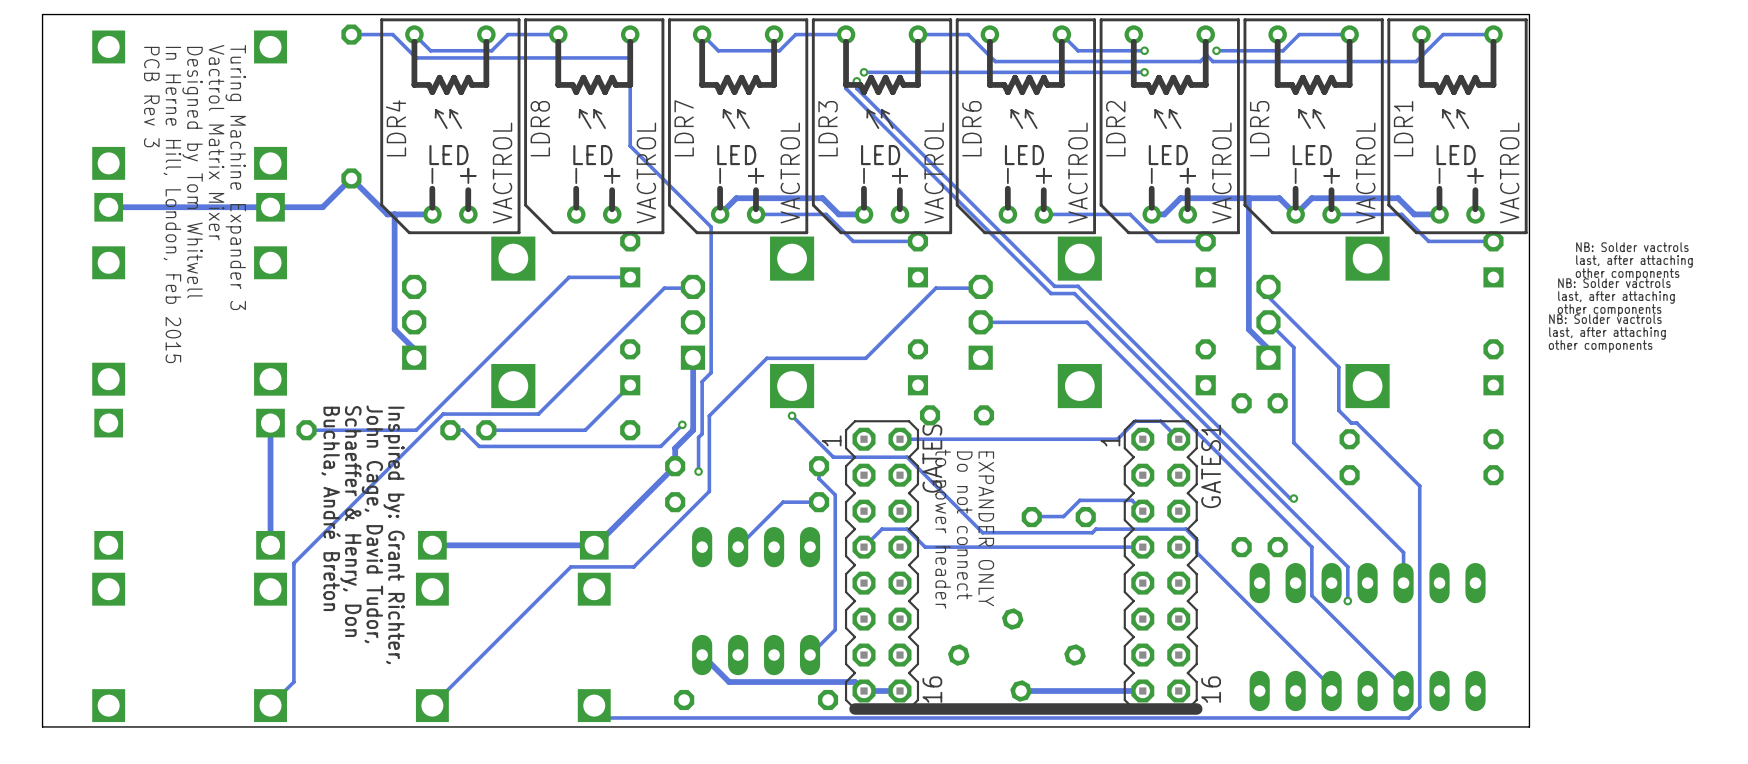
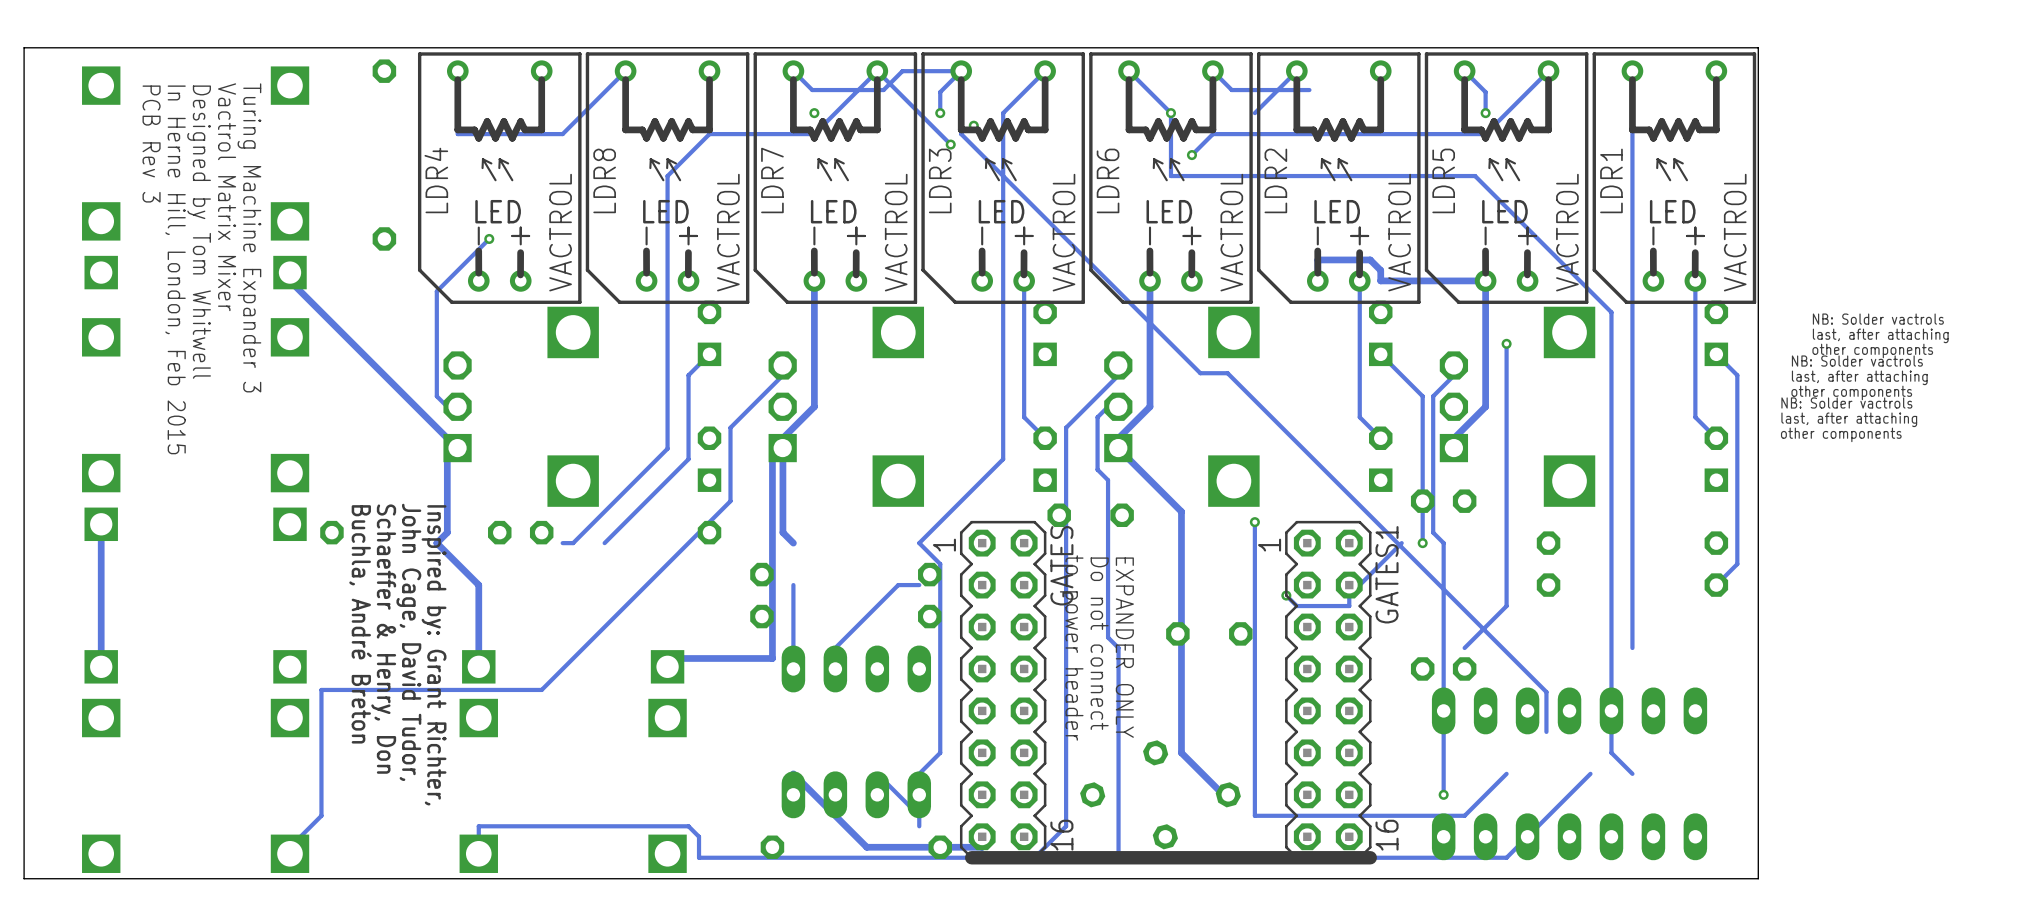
track: (351, 34) (392, 34) (416, 57) (630, 57) -> none
track: (558, 34) (507, 34) (491, 50) (430, 50) (414, 34) -> (625, 71) (562, 134) (457, 134) (457, 71)
track: none -> (961, 71) (940, 92) (940, 113)
track: (917, 34) (968, 34) (995, 61) (1200, 61) (1206, 55) -> (1045, 71) (1003, 113) (1003, 459) (919, 543) (940, 564) (940, 752) (919, 773)
track: none -> (1296, 71) (1254, 113)
track: none -> (1464, 71) (1485, 92) (1485, 113)
track: (1349, 34) (1299, 34) (1283, 50) (1216, 50) -> (1548, 71) (1485, 134) (1212, 134) (1191, 155)
track: none -> (1632, 71) (1632, 647)
track: (1493, 34) (1443, 34) (1416, 61) (1212, 61) (1205, 54) (1205, 34) -> none
via: (1144, 50) -> none
via: (1216, 50) -> none
via: none -> (814, 113)
via: none -> (940, 113)
via: none -> (1170, 113)
via: none -> (1485, 113)
via: (864, 72) -> none
track: (1144, 72) (864, 72) -> none
via: (1144, 72) -> none
track: (856, 81) (856, 88) (1054, 286) (1078, 286) (1290, 498) (1293, 498) -> none
track: (630, 88) (630, 146) (711, 227) (711, 372) (702, 381) (702, 433) (698, 437) (698, 471) -> none
via: none -> (950, 144)
via: none -> (1191, 155)
track: none -> (489, 238) (436, 291) (436, 396) (447, 406) (457, 406)
via: none -> (489, 238)
track: (1248, 198) (1248, 329) (1266, 347) (1268, 357) -> (1317, 280) (1317, 259) (1370, 259) (1380, 270) (1380, 280) (1485, 280) (1485, 406) (1454, 438) (1453, 448)
track: (108, 207) (322, 207) (351, 178) (387, 214) (432, 214) -> none
track: (394, 214) (394, 329) (412, 347) (414, 357) -> none
track: (756, 214) (826, 214) (853, 241) (917, 241) -> none
track: (864, 214) (838, 214) (822, 198) (736, 198) (720, 214) -> (667, 664) (667, 658) (772, 658) (772, 448) (782, 448) (782, 438) (814, 406) (814, 280)
track: none -> (1024, 280) (1024, 417) (1045, 438)
track: none -> (1150, 280) (1150, 406) (1118, 438) (1118, 448) (1181, 511) (1181, 752) (1223, 794) (1228, 794)
track: (1043, 214) (1130, 214) (1157, 241) (1205, 241) -> none
track: none -> (1359, 280) (1359, 417) (1380, 438)
track: (1331, 214) (1401, 214) (1428, 241) (1493, 241) -> none
track: (1439, 214) (1414, 214) (1398, 198) (1311, 198) (1295, 214) (1279, 198) (1180, 198) (1164, 214) (1151, 214) -> none
track: none -> (1695, 280) (1695, 417) (1716, 438)
track: none -> (1506, 343) (1506, 606) (1464, 647)
via: none -> (1506, 343)
track: (630, 277) (569, 277) (416, 430) (306, 430) -> (709, 354) (688, 375) (688, 459) (604, 543)
track: none -> (1380, 354) (1422, 396) (1422, 543)
track: none -> (1716, 354) (1737, 375) (1737, 564) (1716, 585)
track: (692, 286) (664, 288) (594, 358) -> (950, 144) (877, 71) (814, 134) (709, 134) (667, 176) (667, 448)
track: (980, 286) (935, 288) (865, 358) (766, 358) (709, 415) (709, 491) (633, 566) (570, 566) (432, 705) -> (1118, 365) (1118, 375) (1066, 427) (1066, 826) (1034, 857) (699, 857) (699, 836) (688, 826) (478, 826) (478, 853)
track: (1268, 286) (1268, 297) (1338, 367) (1338, 410) (1351, 423) (1356, 423) (1419, 485) (1419, 707) (1408, 717) (605, 717) (594, 705) -> (1453, 365) (1454, 375) (1433, 396) (1433, 532) (1443, 543) (1443, 794)
track: (980, 322) (1087, 322) (1311, 547) (1311, 595) (1403, 687) (1403, 691) -> (1118, 406) (1108, 406) (1097, 417) (1097, 469) (1108, 480) (1108, 637) (1118, 647) (1118, 857) (1506, 857) (1590, 773)
track: (1268, 322) (1293, 347) (1293, 442) (1403, 552) -> (1129, 71) (1170, 113) (1170, 176) (1475, 176) (1611, 312) (1611, 675)
track: (630, 385) (585, 430) (486, 430) -> none
track: (538, 414) (443, 414) (293, 563) (293, 682) (270, 705) -> (782, 365) (782, 375) (730, 427) (730, 501) (541, 689) (321, 689) (321, 815) (290, 847) (290, 853)
track: none -> (602, 513) (573, 543) (562, 543)
track: (792, 415) (833, 457) (907, 457) (982, 532) (1092, 532) (1096, 529) (1185, 529) (1196, 539) (1196, 552) (1331, 687) (1331, 691) -> none
via: (792, 415) -> none
track: none -> (1254, 522) (1254, 815) (1464, 815) (1506, 773)
via: none -> (1254, 522)
track: (270, 423) (270, 545) -> (101, 524) (101, 666)
track: (682, 424) (660, 446) (479, 446) (462, 430) (450, 430) -> none
via: (682, 424) -> none
track: (693, 430) (675, 448) (675, 466) (597, 543) (594, 543) -> (782, 532) (793, 543)
track: (1178, 439) (1160, 421) (1135, 421) (1117, 439) (899, 439) -> none
track: none -> (1401, 543) (1359, 585) (1349, 585) (1349, 606) (1296, 606) (1286, 595)
track: (819, 466) (819, 478) (835, 494) (835, 629) (810, 655) -> none
via: (698, 471) -> none
track: none -> (793, 585) (793, 647)
track: none -> (919, 585) (898, 585) (835, 647)
via: none -> (1286, 595)
via position: (1293, 498) -> (1422, 543)
track: (819, 502) (783, 502) (738, 547) -> none
track: (1142, 511) (1131, 500) (1079, 500) (1063, 516) (1031, 517) -> none
track: (594, 545) (432, 545) -> (290, 272) (290, 280) (457, 448) (447, 448) (447, 532) (436, 543) (478, 585) (478, 666)
track: (1142, 547) (925, 547) (907, 529) (882, 529) (864, 547) -> none
track: none -> (1611, 710) (1611, 752) (1632, 773)
via: (1347, 601) -> none
track: none -> (793, 773) (866, 847) (982, 847) (982, 836)
track: none -> (877, 773) (919, 815) (919, 826)
track: (702, 655) (729, 682) (855, 682) (864, 691) (899, 691) -> none
via: none -> (1443, 794)
track: (1142, 691) (1021, 691) -> none

